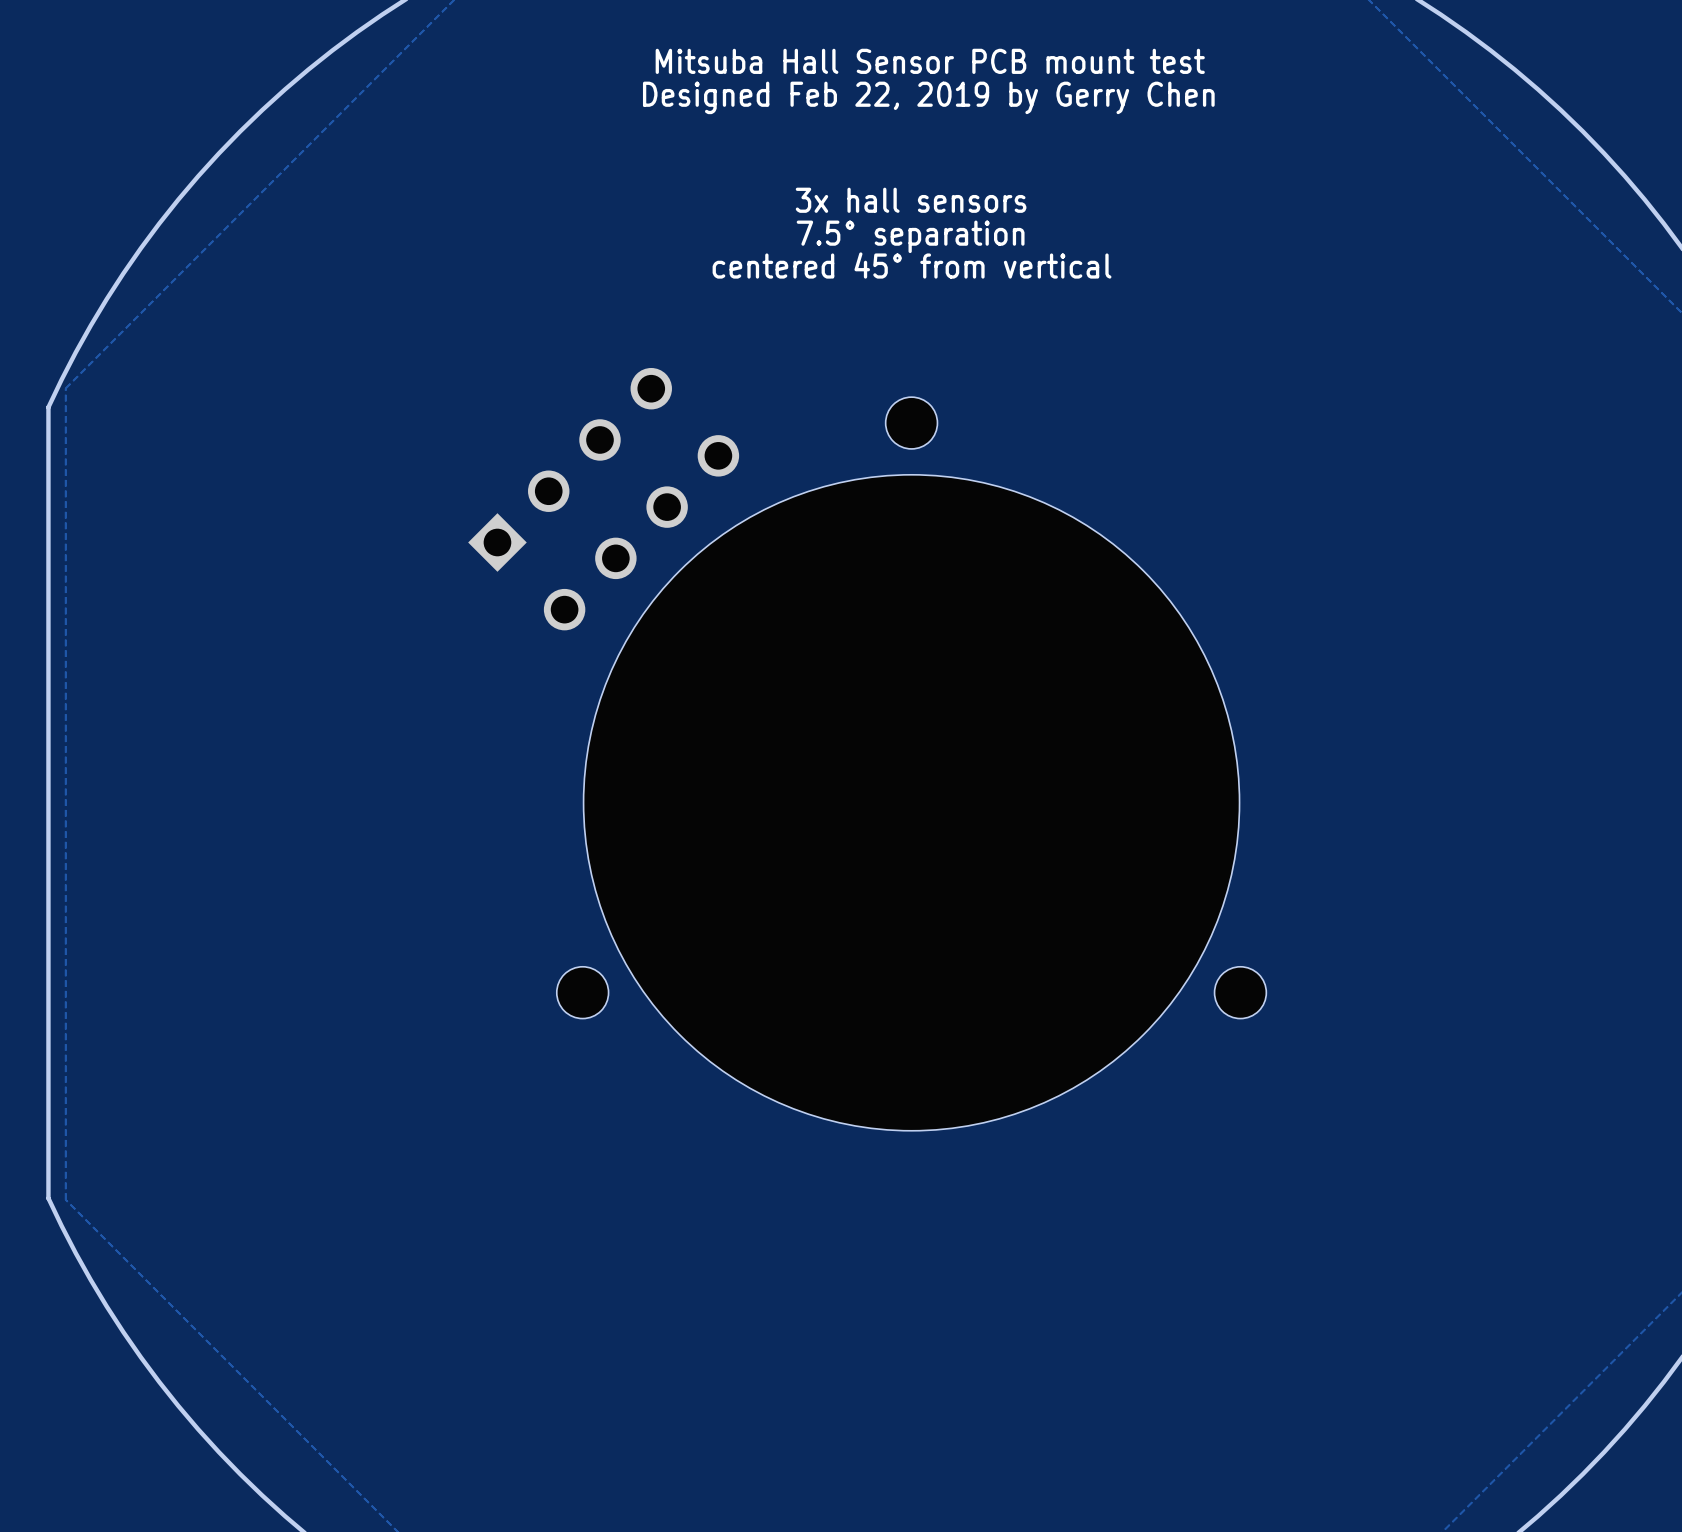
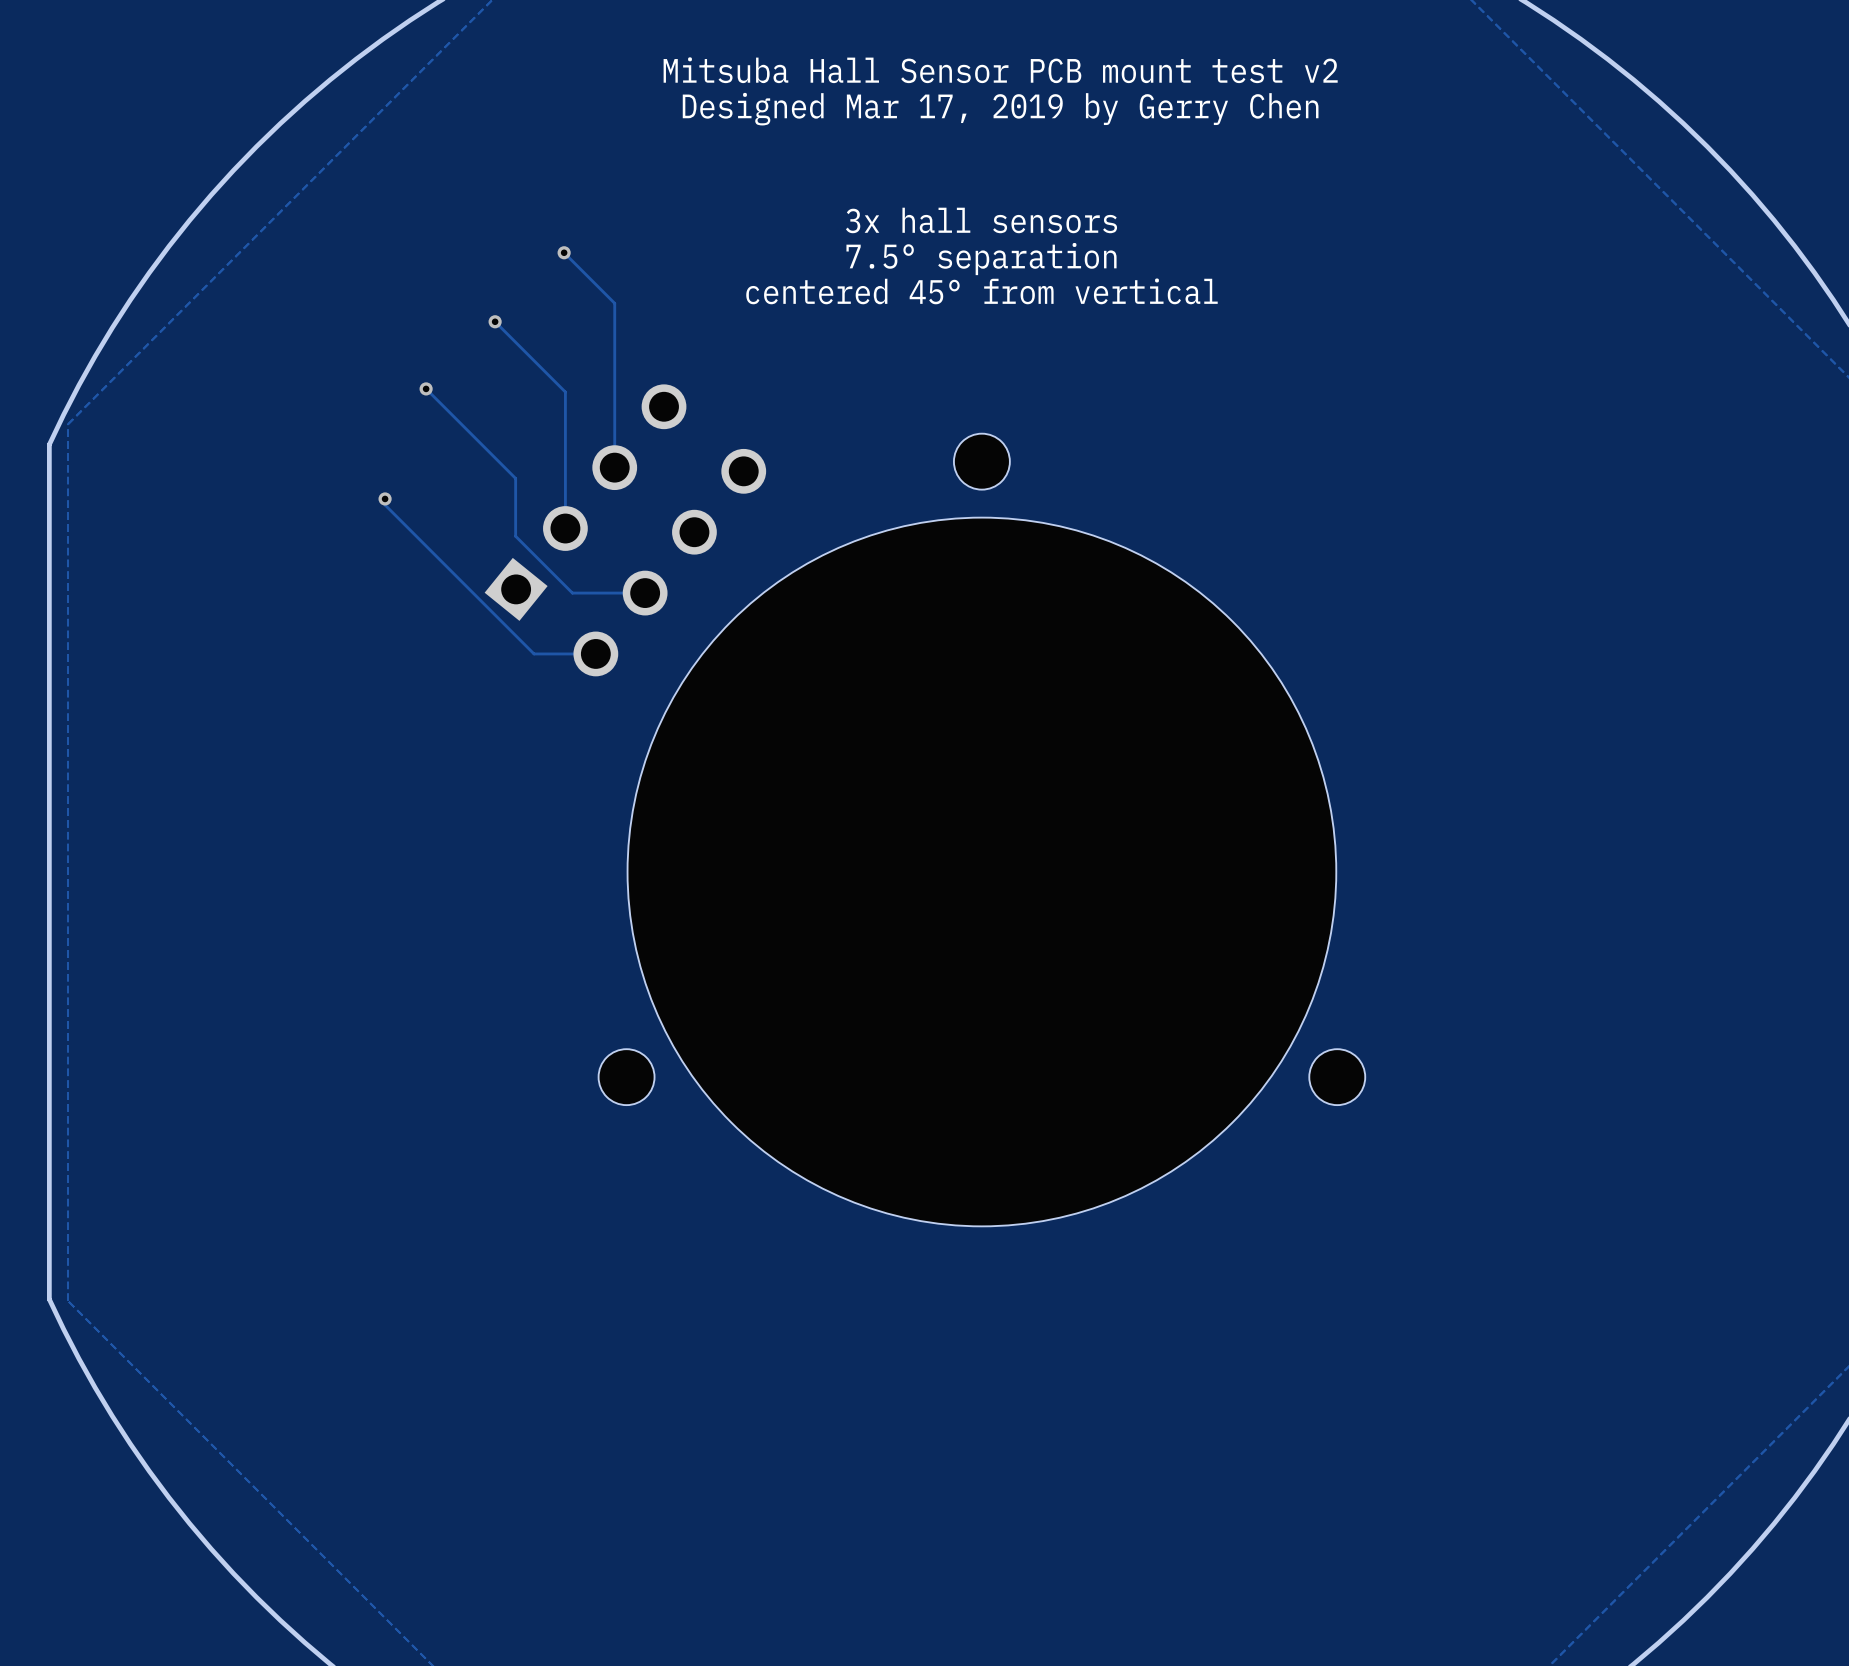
text: Mitsuba Hall Sensor PCB mount test (930, 61) -> Mitsuba Hall Sensor PCB mount test v2 (1000, 70)
text: Designed Feb 22, 2019 by Gerry Chen (928, 97) -> Designed Mar 17, 2019 by Gerry Chen (1000, 109)
track: none -> (564, 252) (614, 303) (614, 467)
via: none -> (564, 252)
track: none -> (495, 321) (565, 392) (565, 528)
via: none -> (495, 321)
track: none -> (426, 388) (515, 478) (515, 536) (572, 593) (645, 593)
via: none -> (426, 388)
track: none -> (385, 498) (385, 504) (534, 653) (595, 653)
via: none -> (385, 498)
part: none -> (625, 530)
part: (603, 499) -> none

